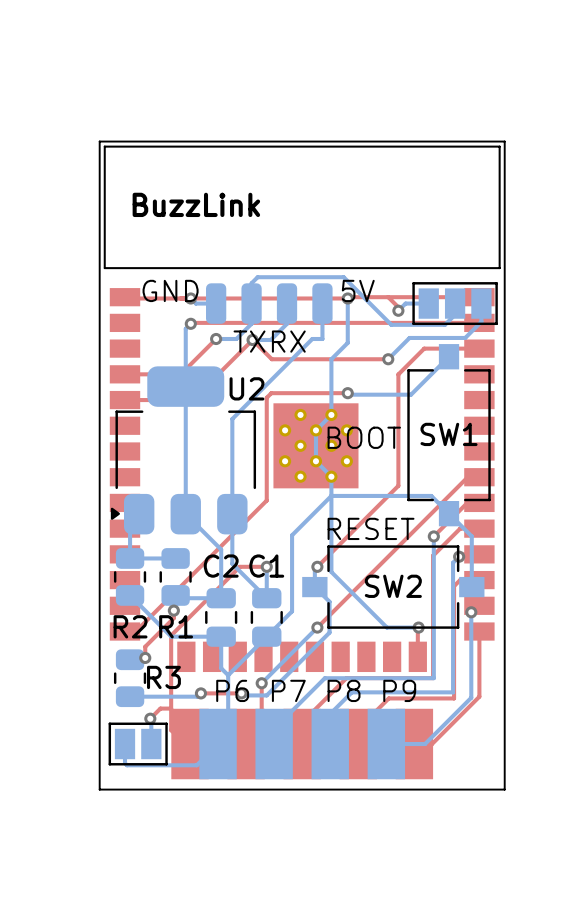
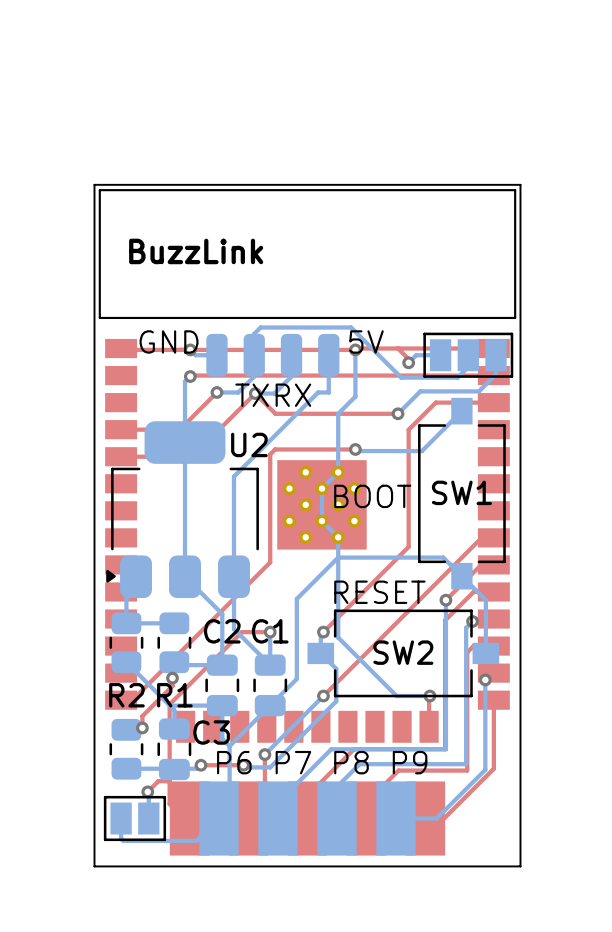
bottom track: none -> (169, 705) (174, 710) (174, 729)
R3 name: R3 (163, 677) -> none
C3: none -> (174, 749)

